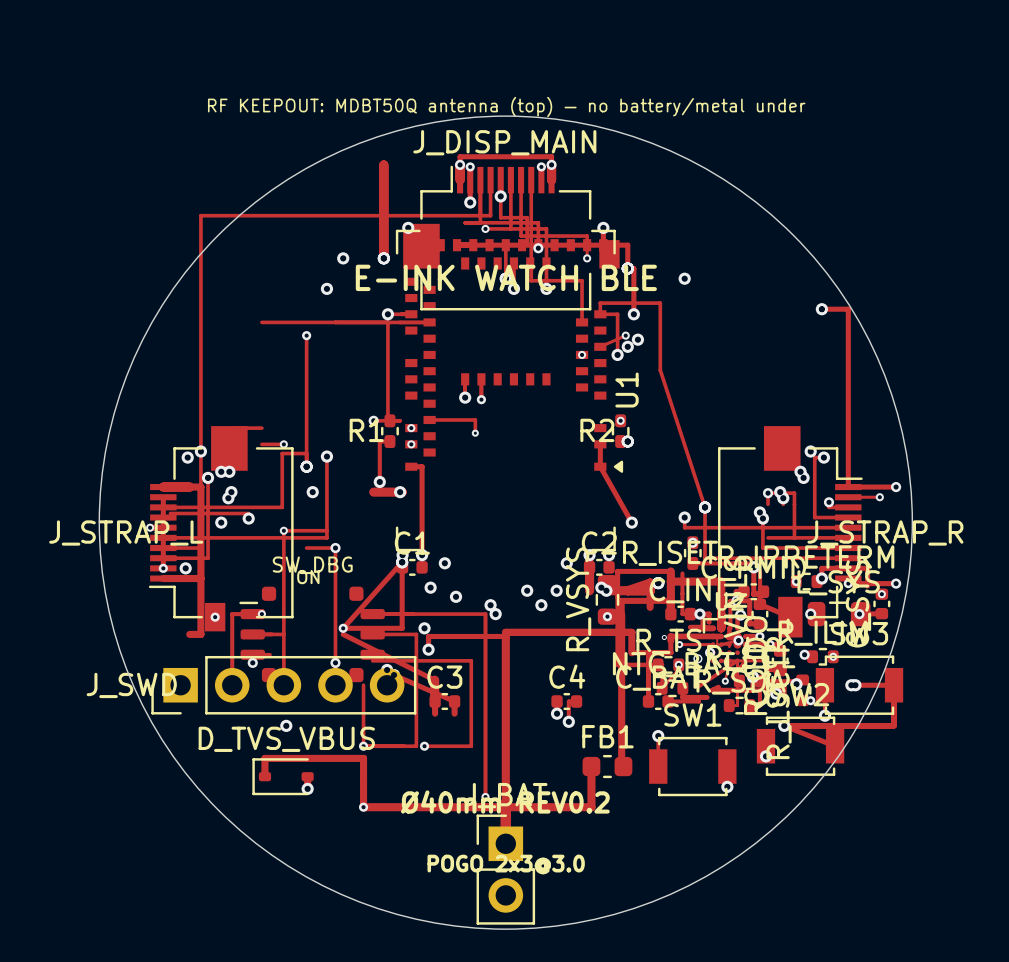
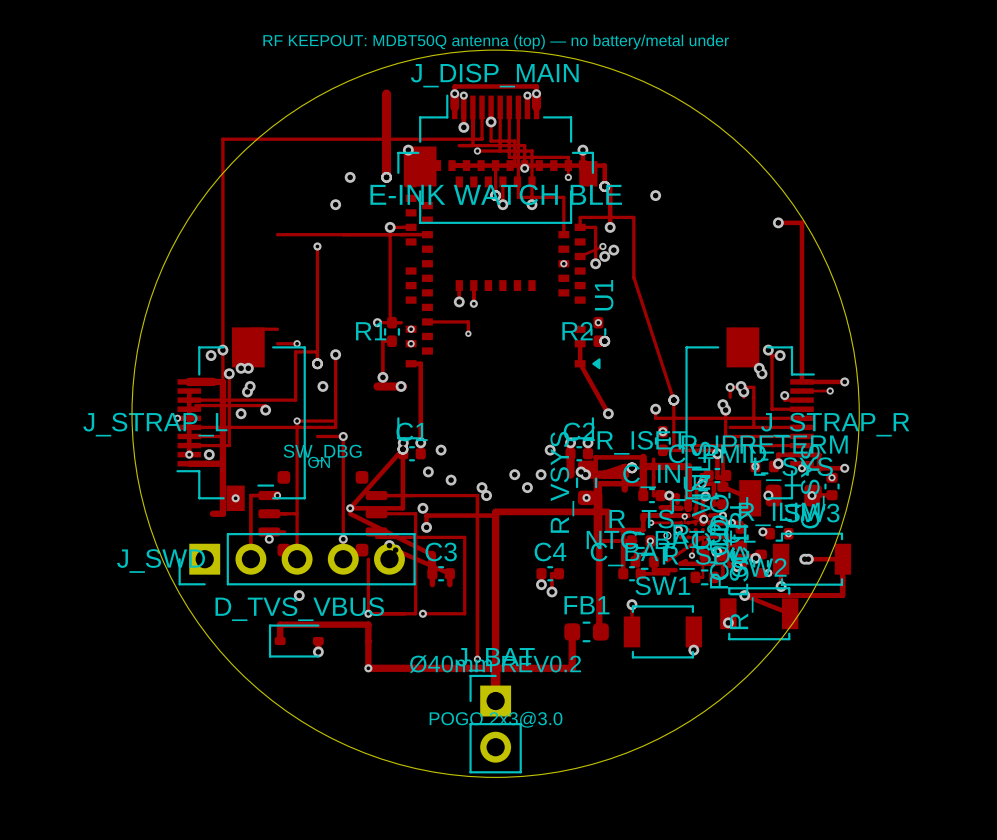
via: (664, 637) -> none
via: none -> (684, 516)

